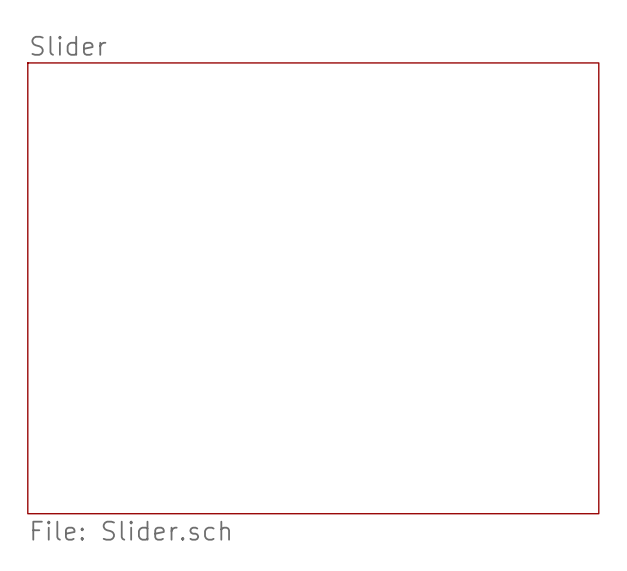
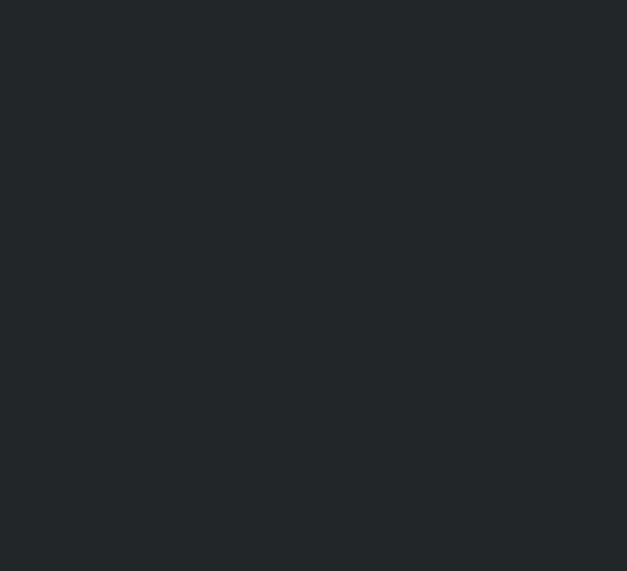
sheet Slider: File: Slider.sch (313, 288) -> none

